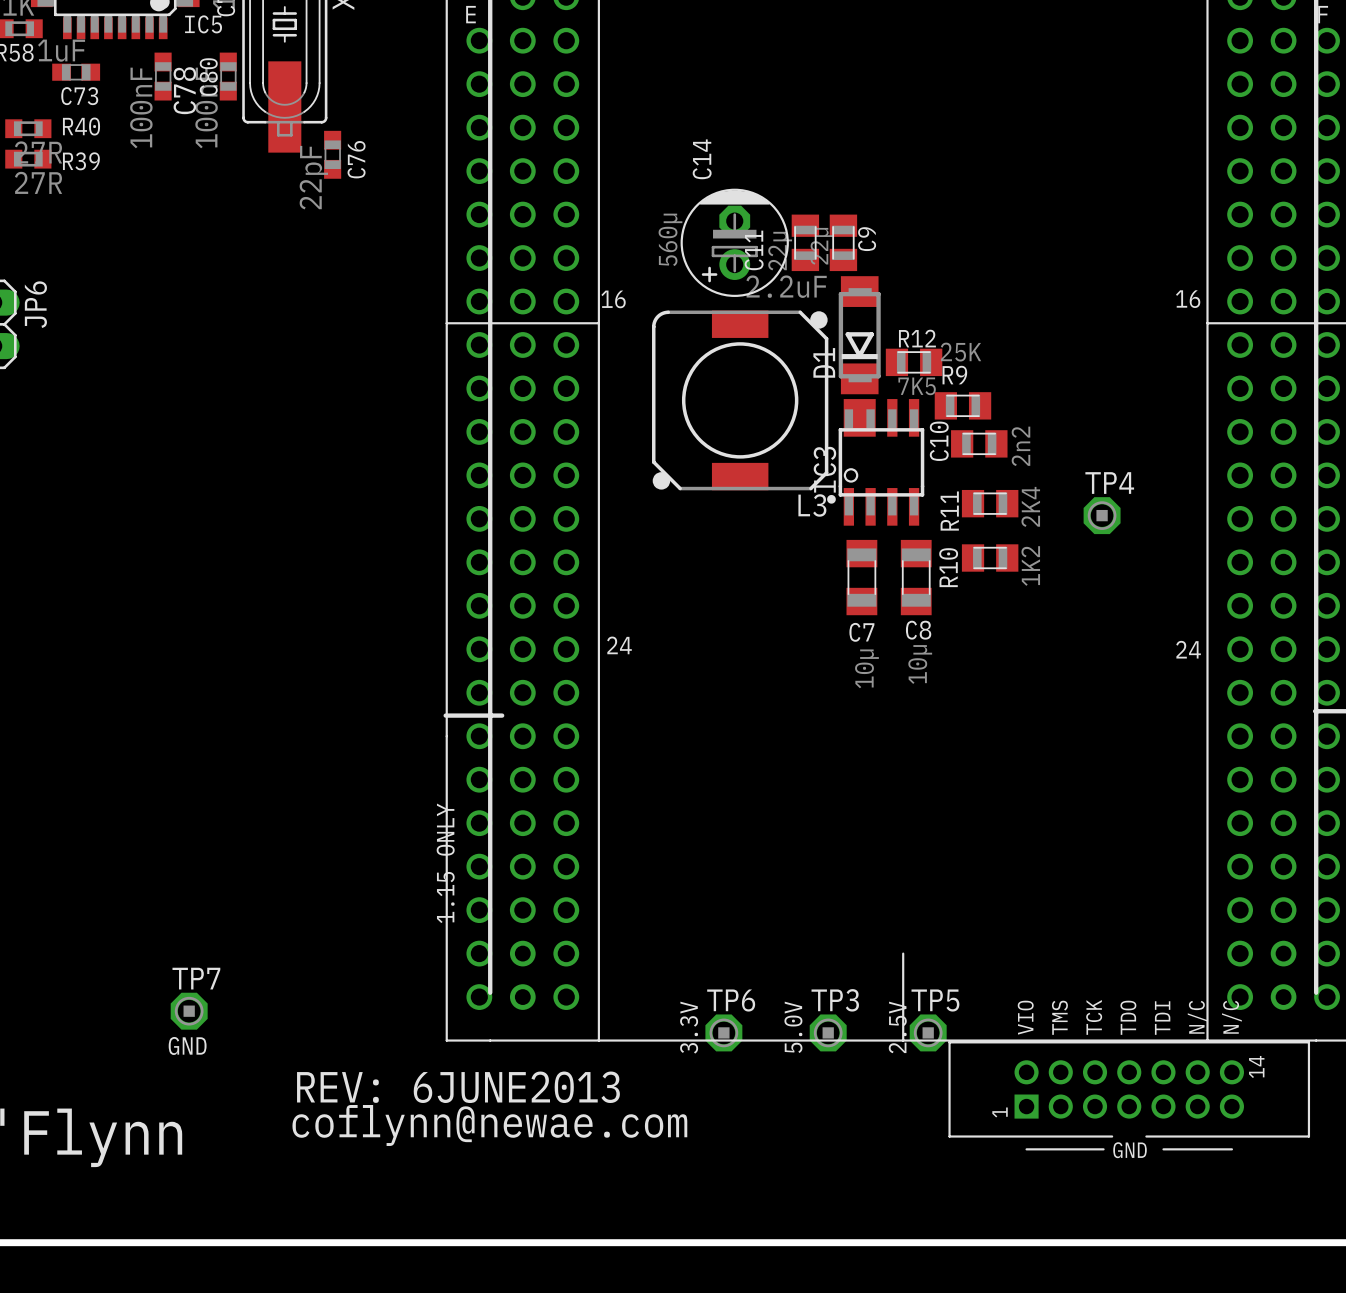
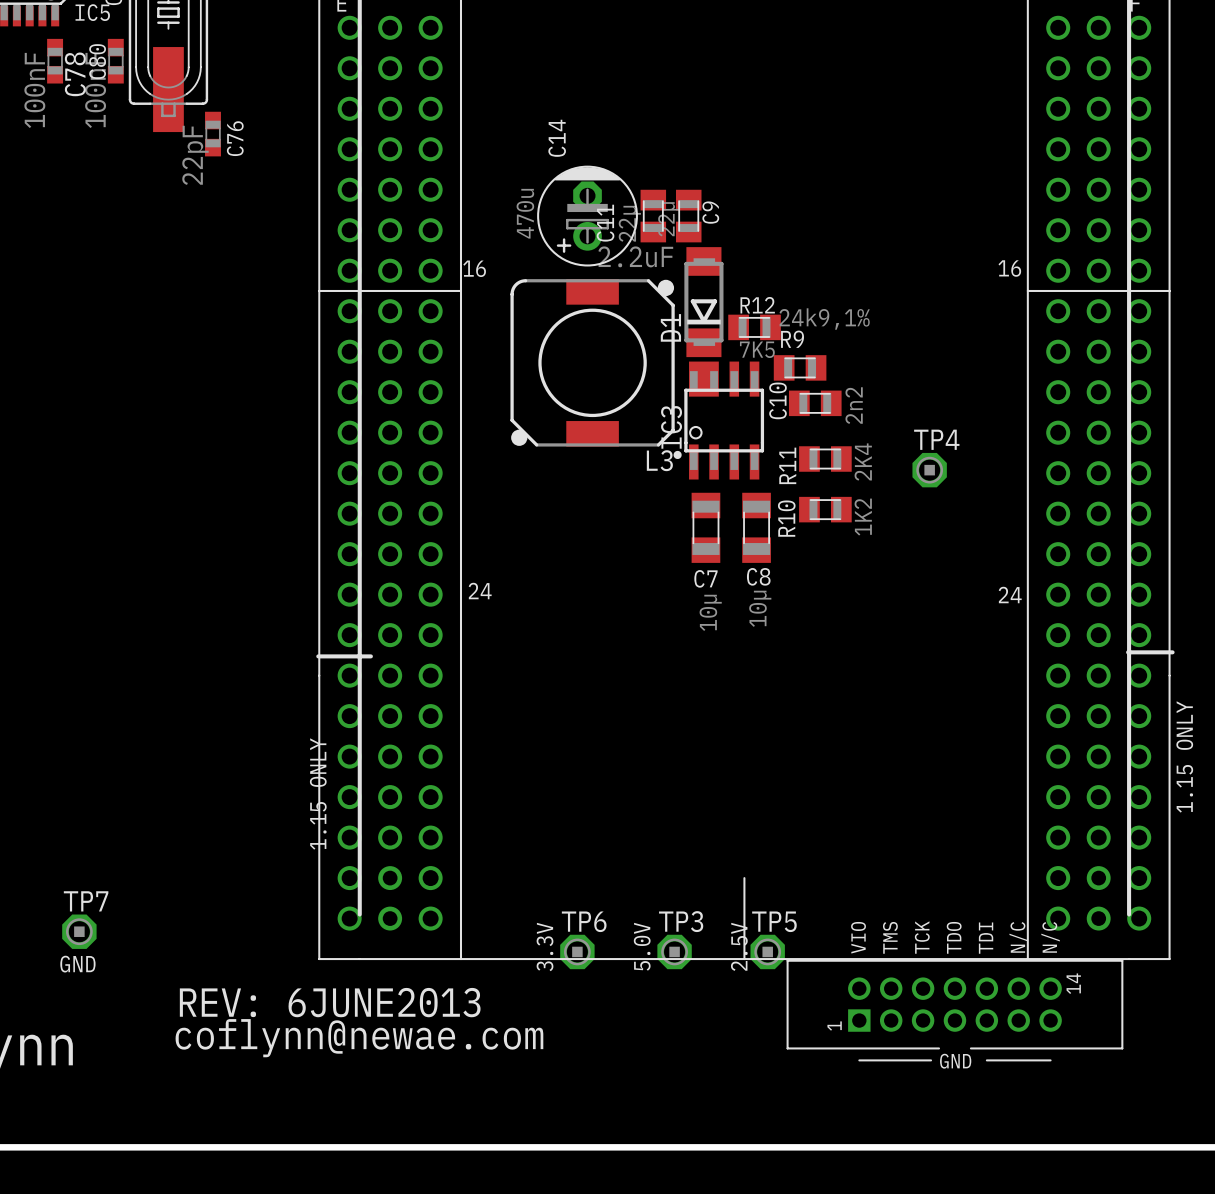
C14 value: 560µ (670, 239) -> 470u (525, 213)
R9 value: 25K (961, 352) -> 24k9,1% (824, 319)

